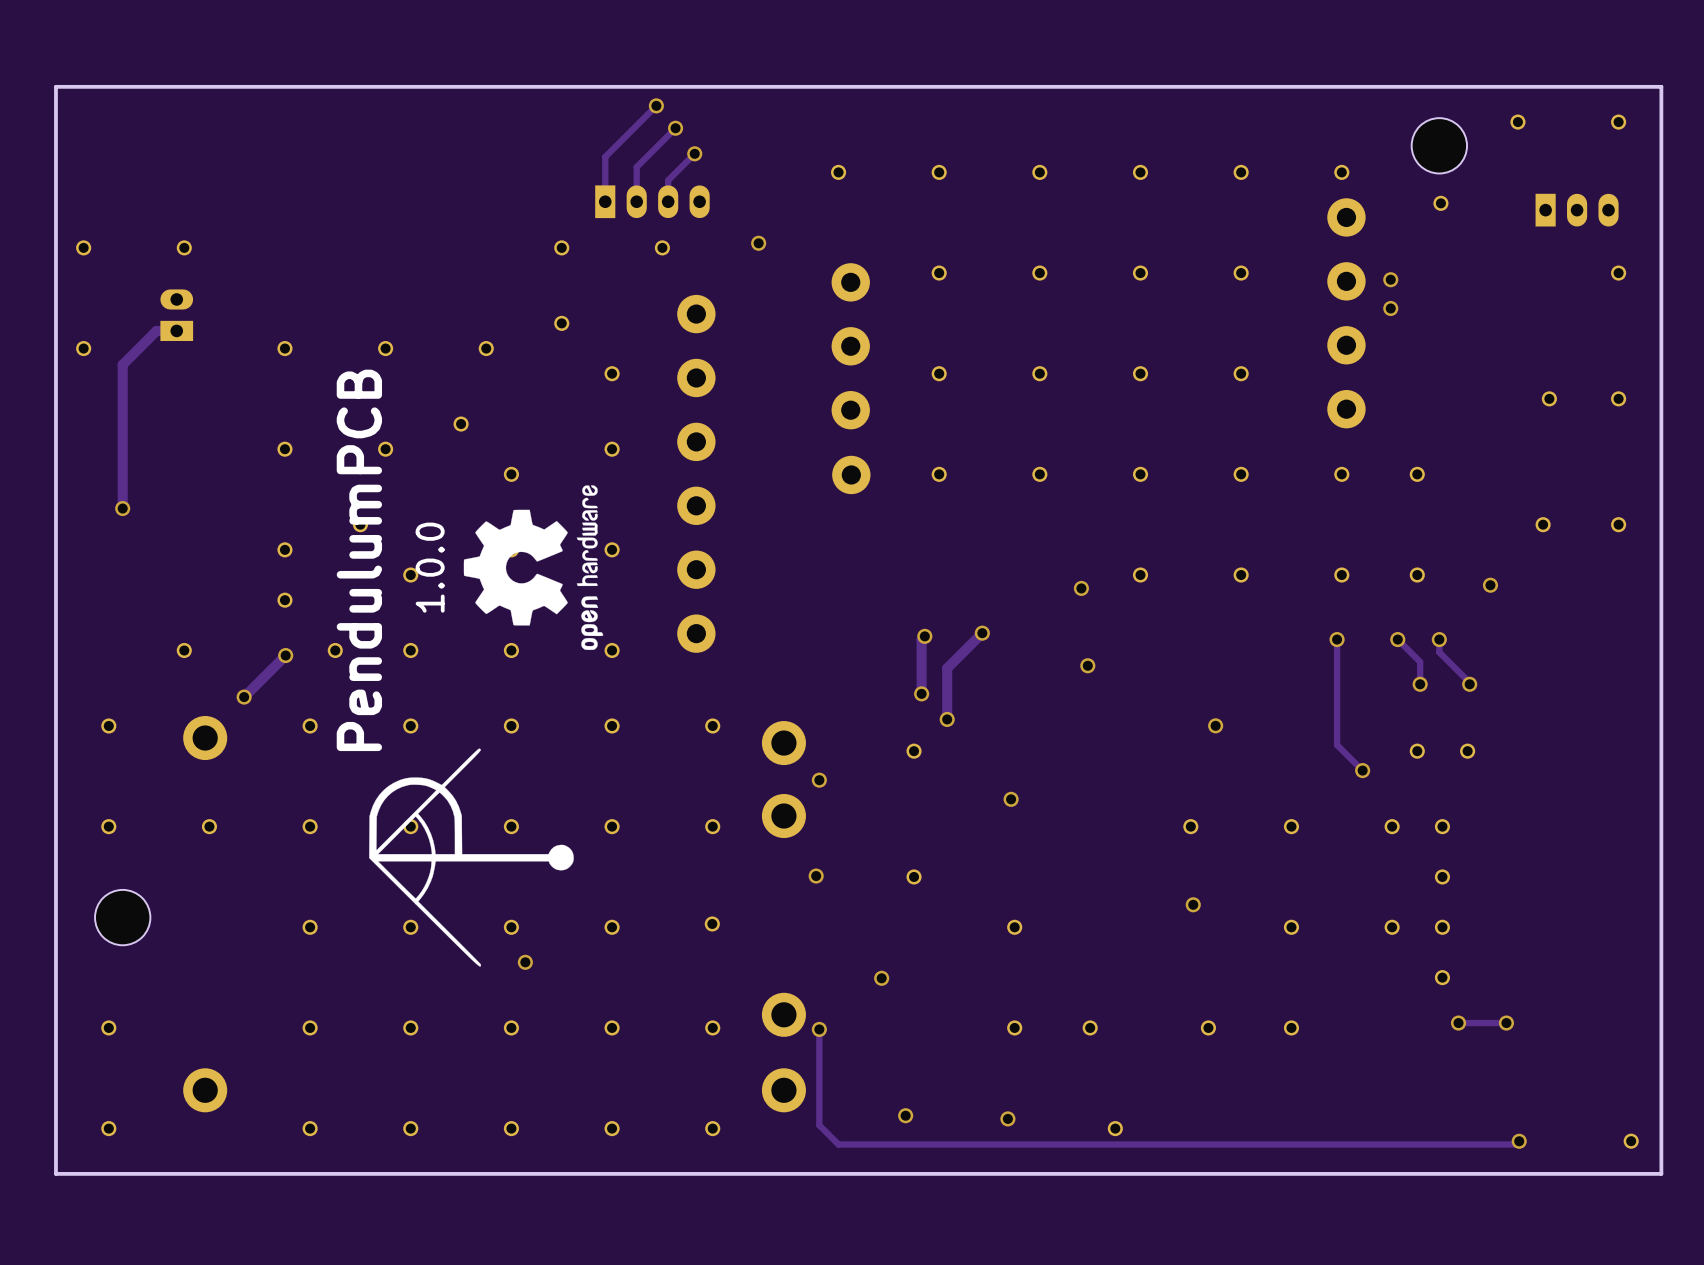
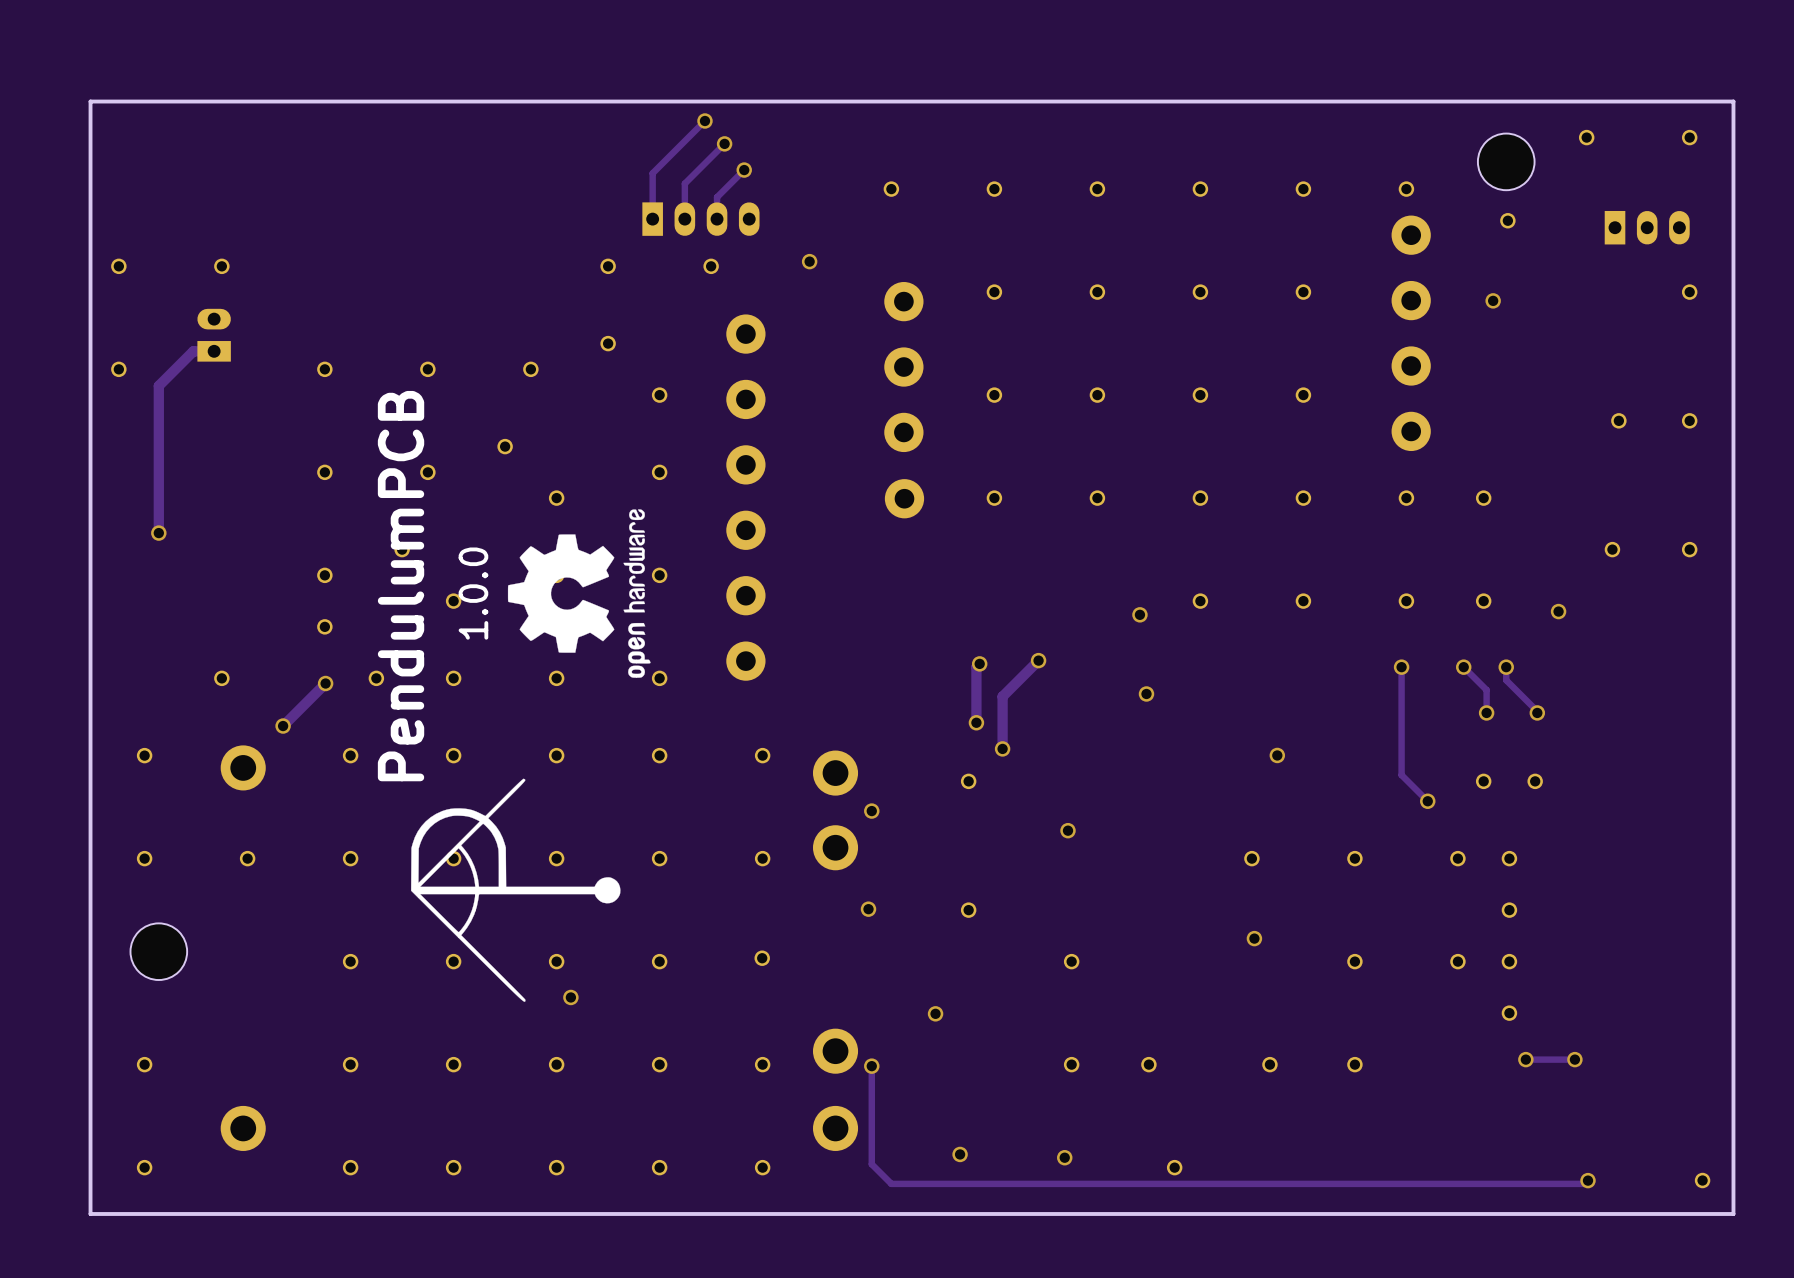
via: (1390, 279) -> none
via: none -> (1493, 300)
via: (1390, 308) -> none

